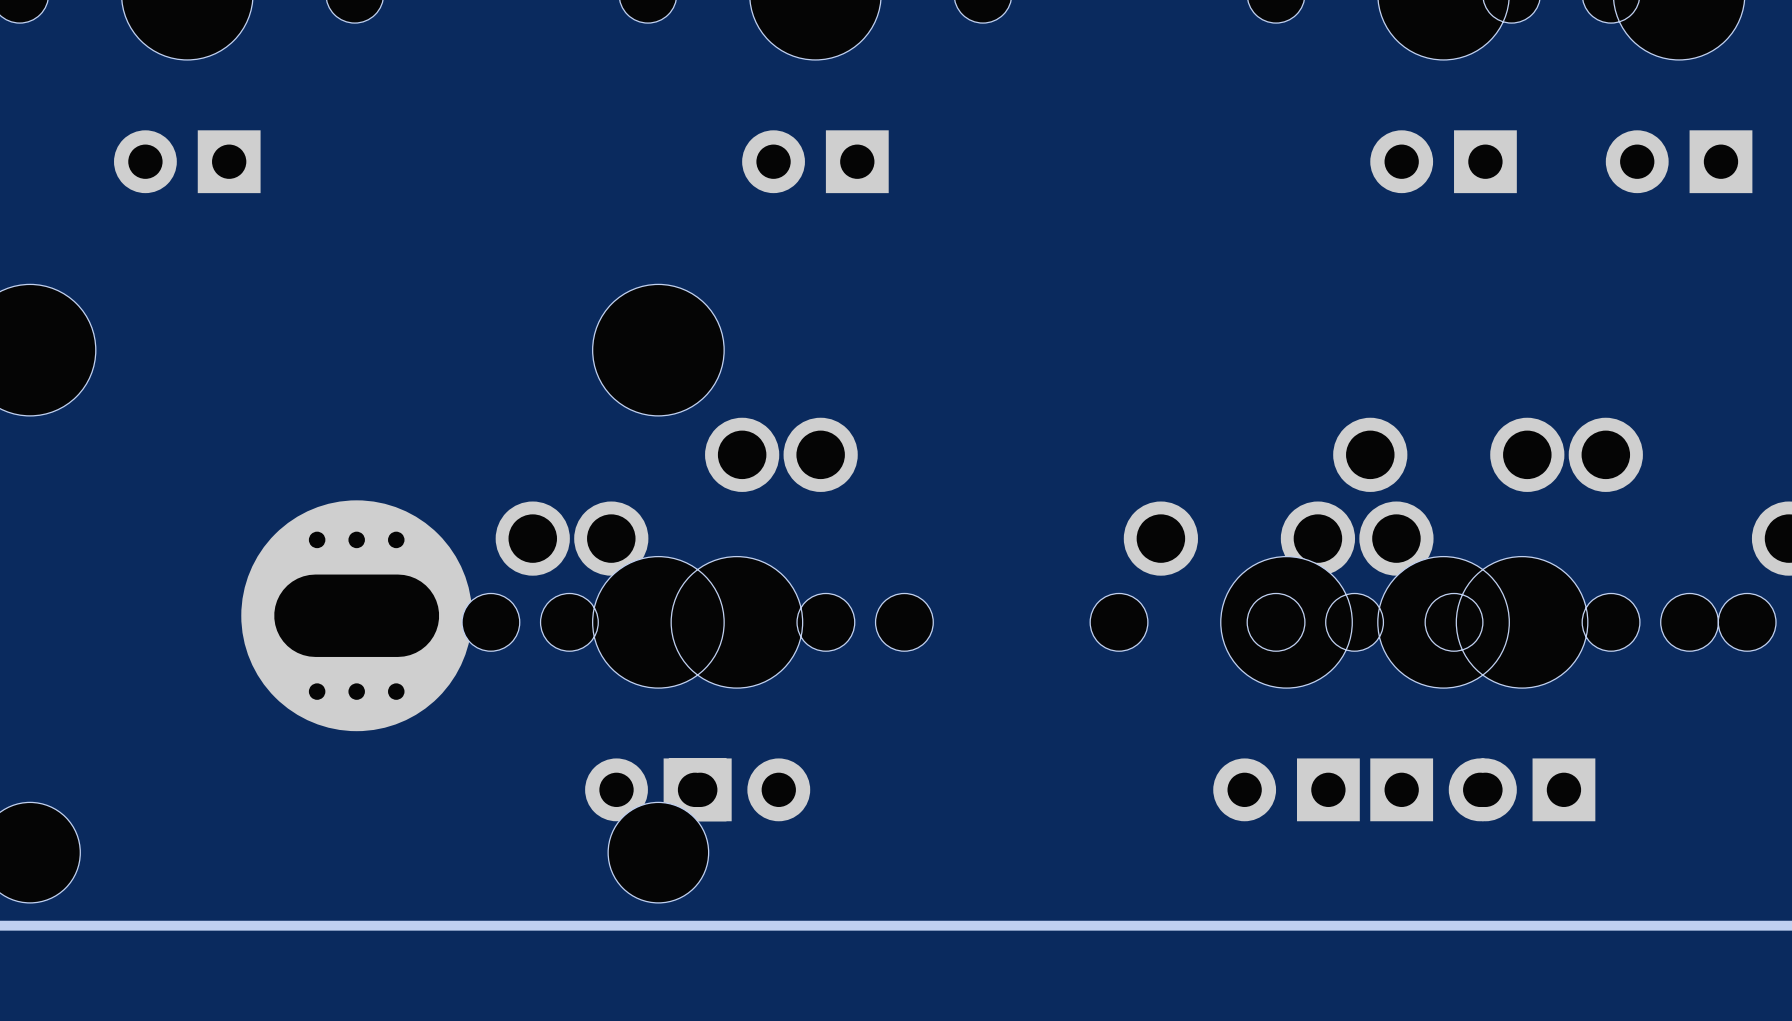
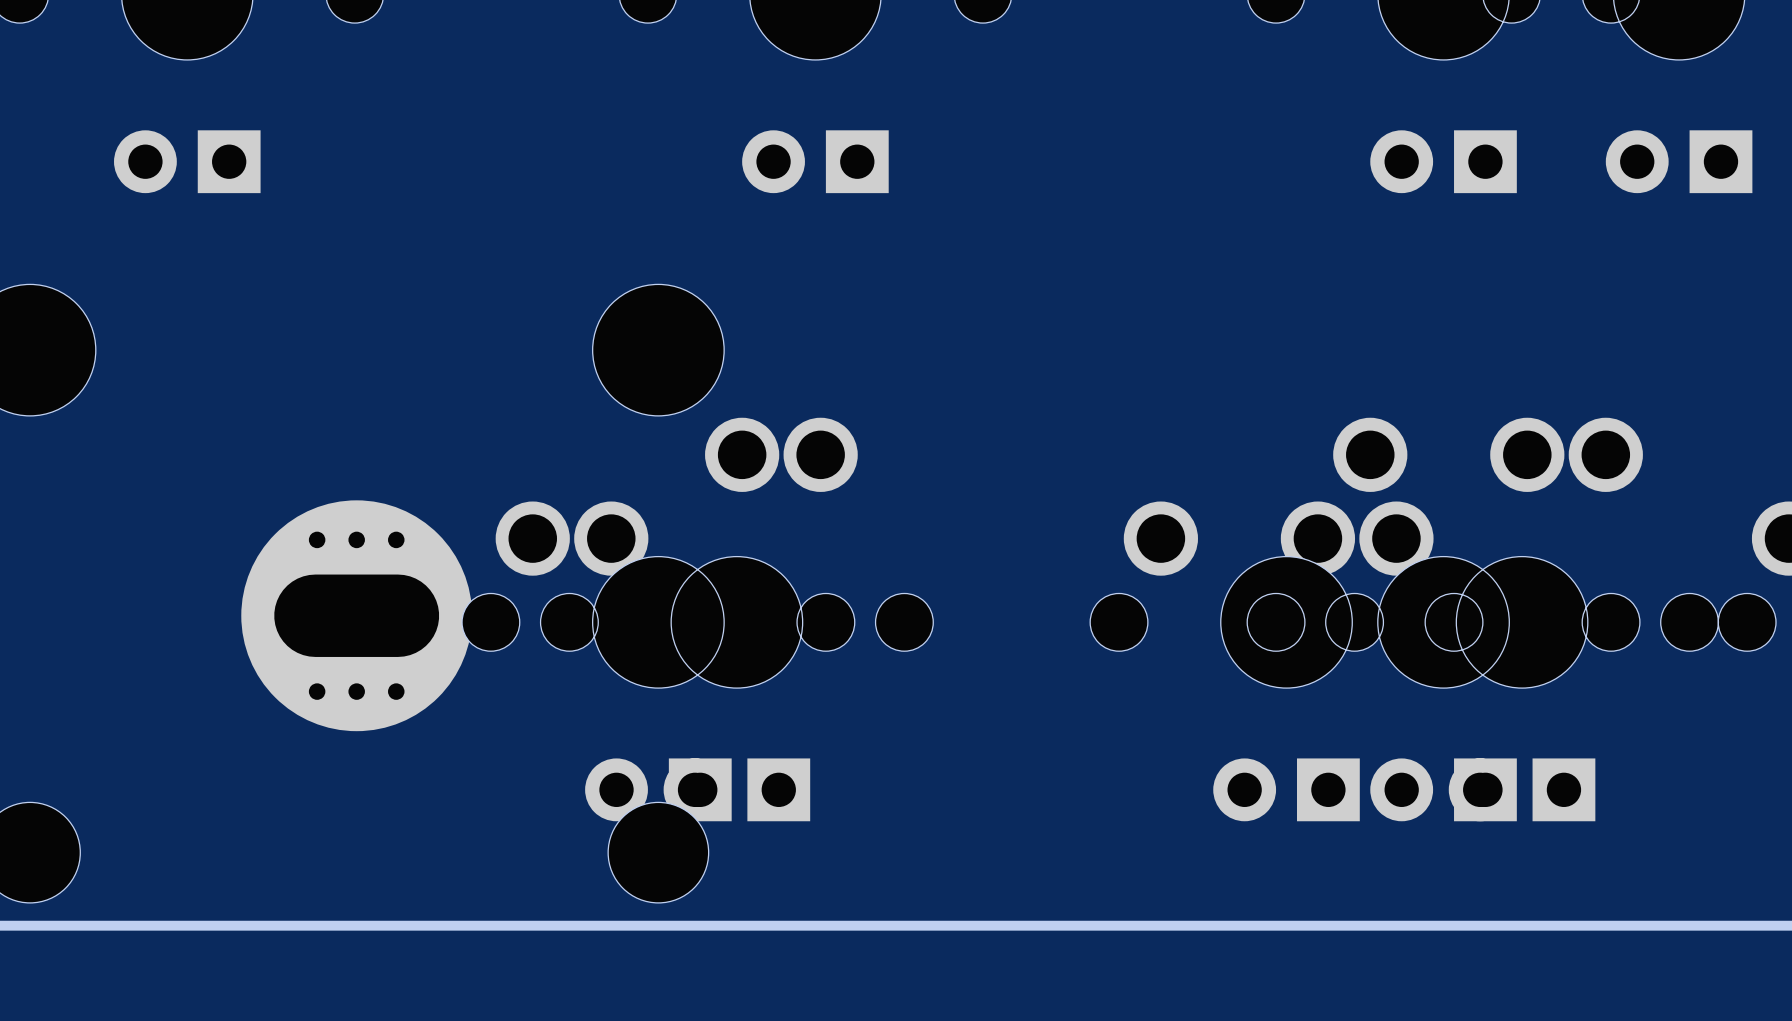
part footprint: [540, 417, 934, 822] -> [540, 417, 934, 822]
part footprint: [1247, 417, 1640, 822] -> [1247, 417, 1640, 822]

